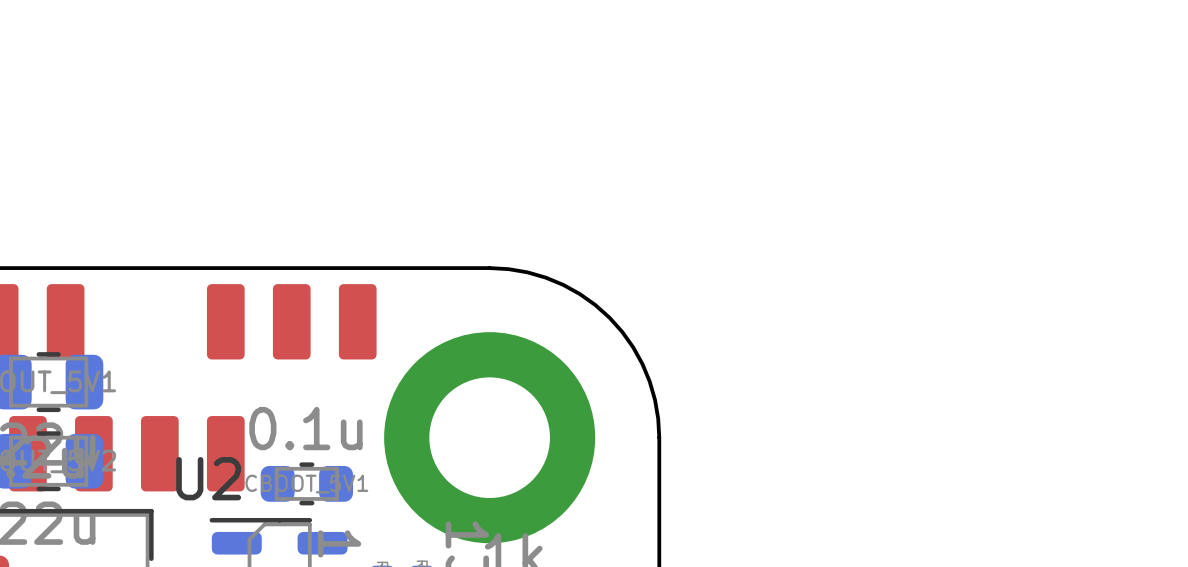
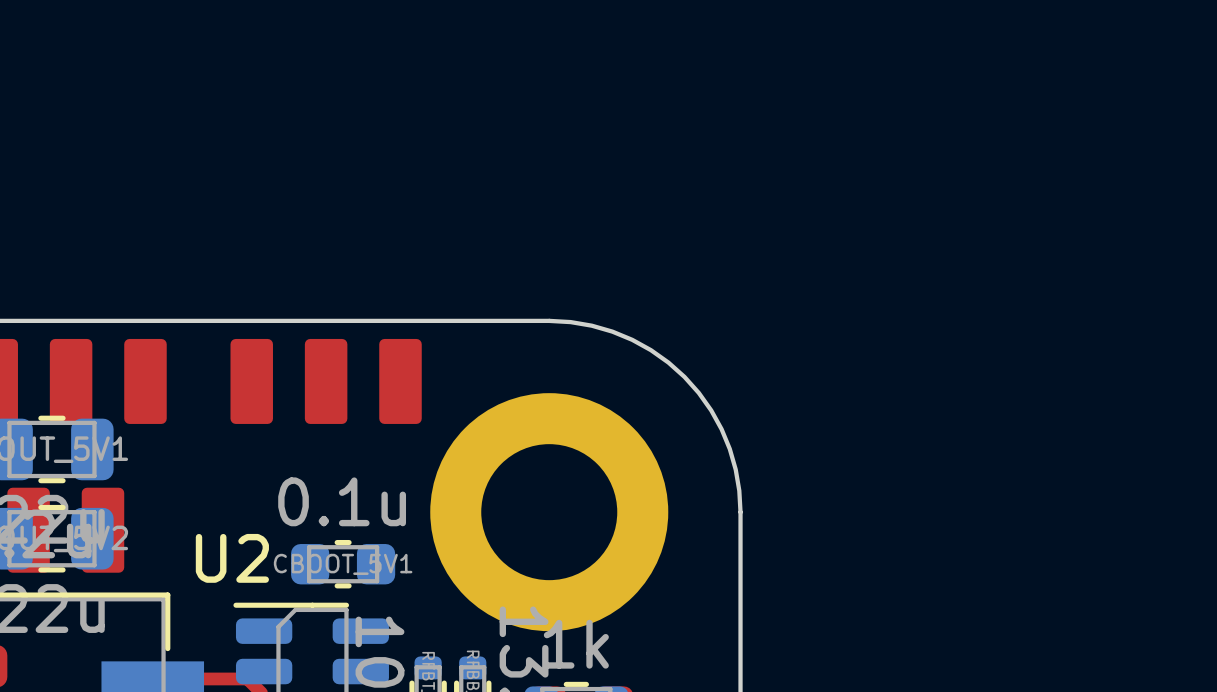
part: none -> (145, 381)
part: (159, 453) -> none
part: (225, 453) -> none

